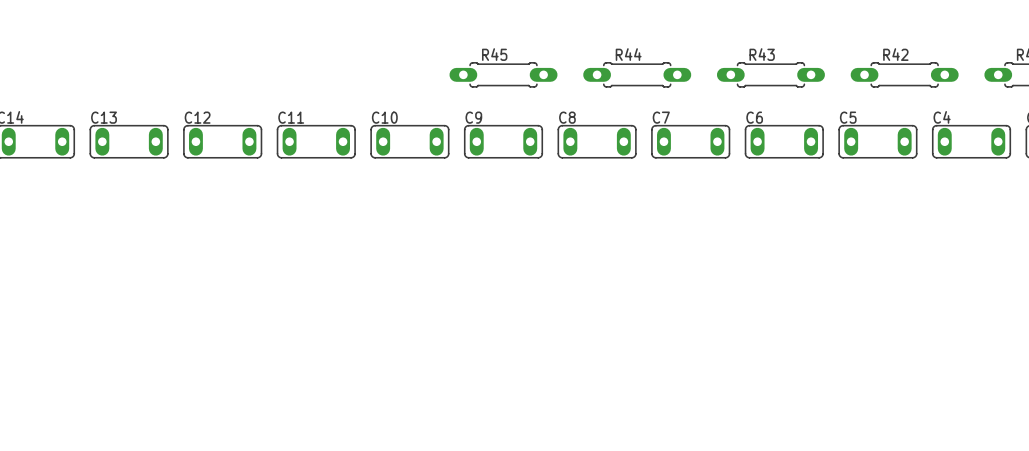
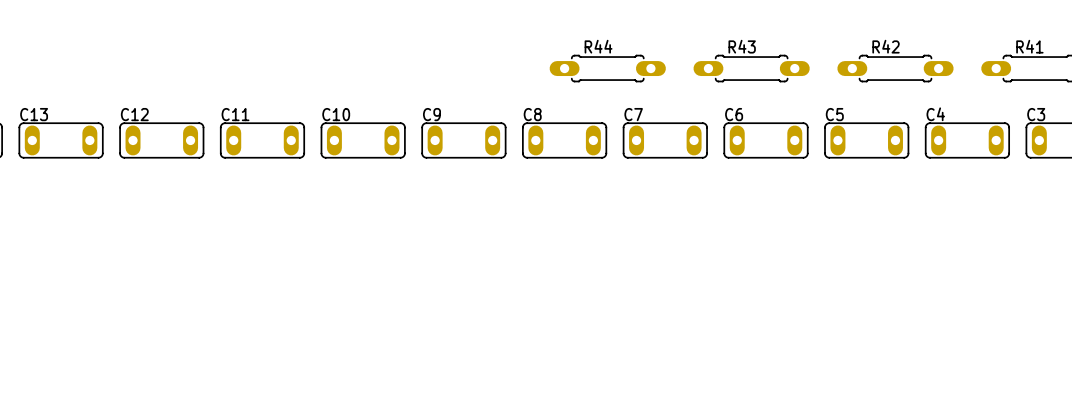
R45: (503, 74) -> none

